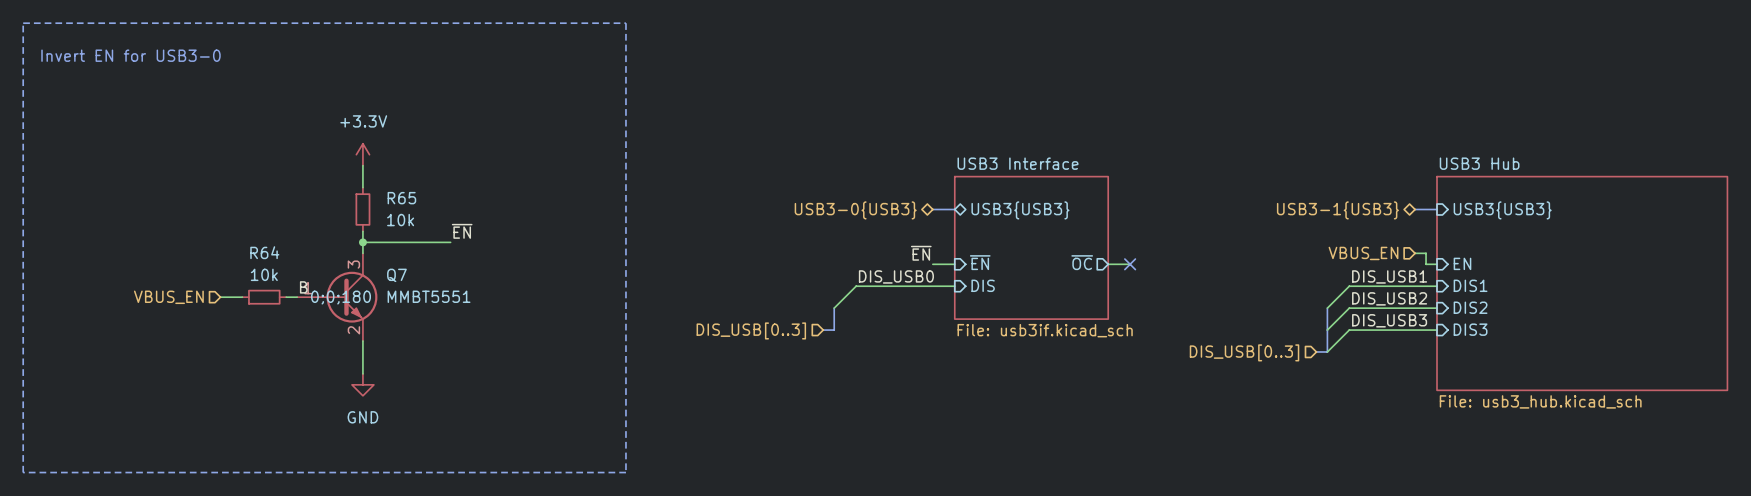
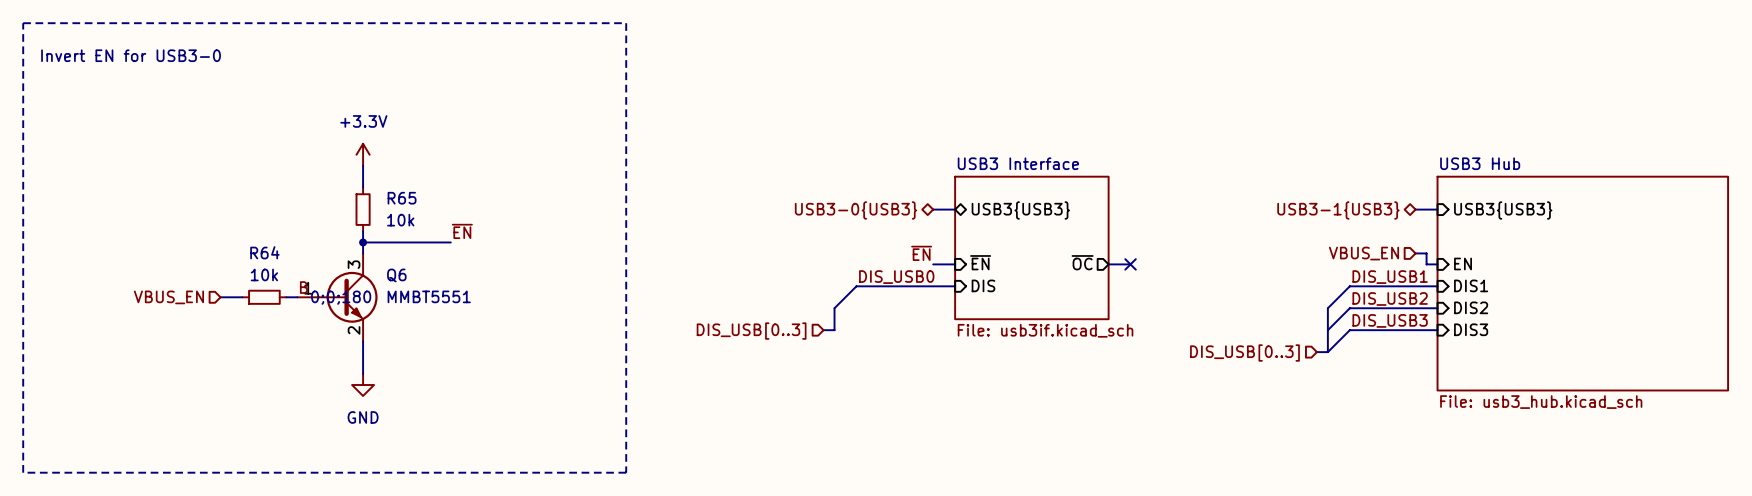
Q7 name: Q7 (396, 275) -> Q6 (396, 275)

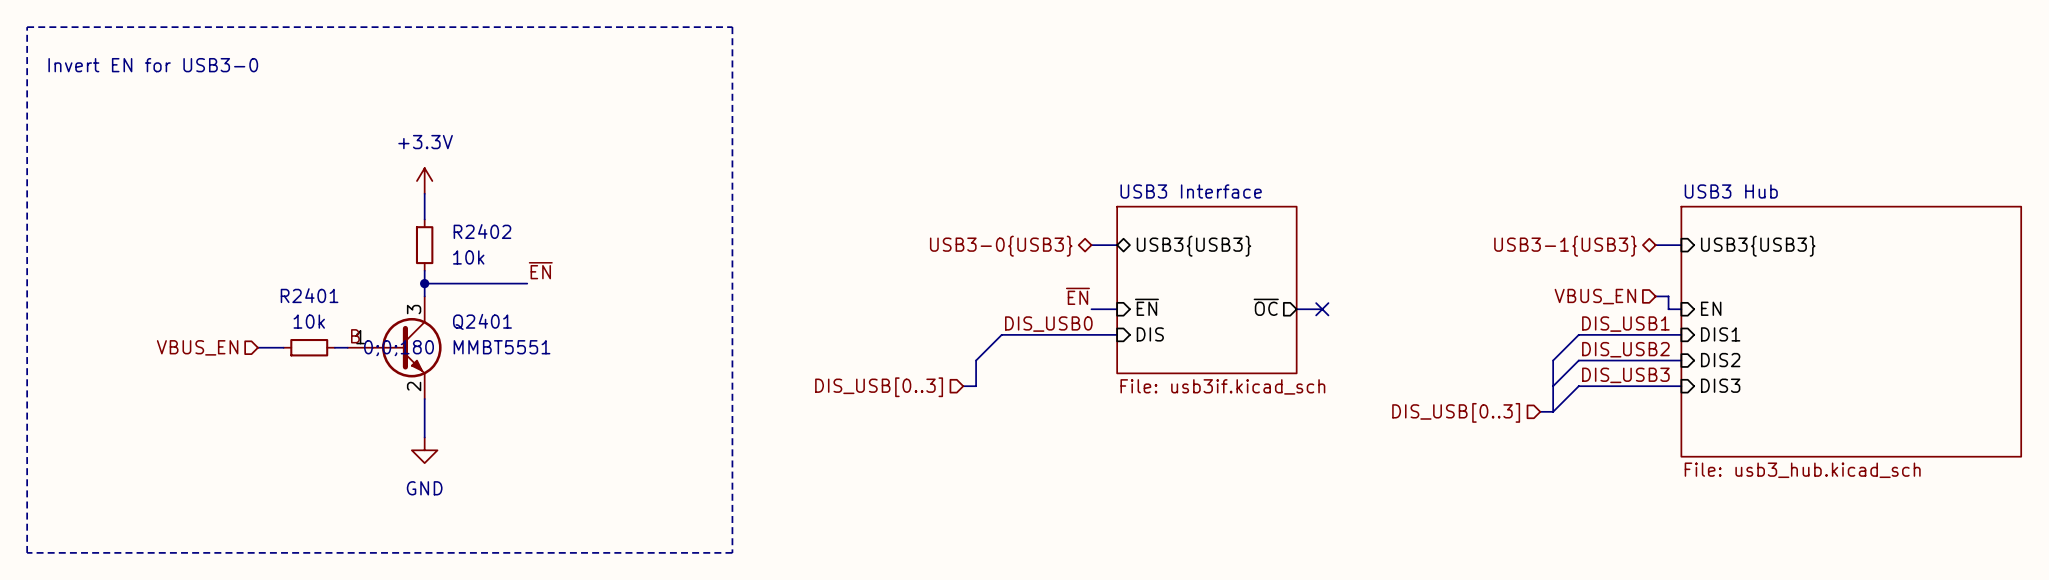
R65 name: R65 (402, 198) -> R2402 (482, 231)
R64 name: R64 (264, 252) -> R2401 (309, 295)
Q6 name: Q6 (396, 275) -> Q2401 (482, 321)

